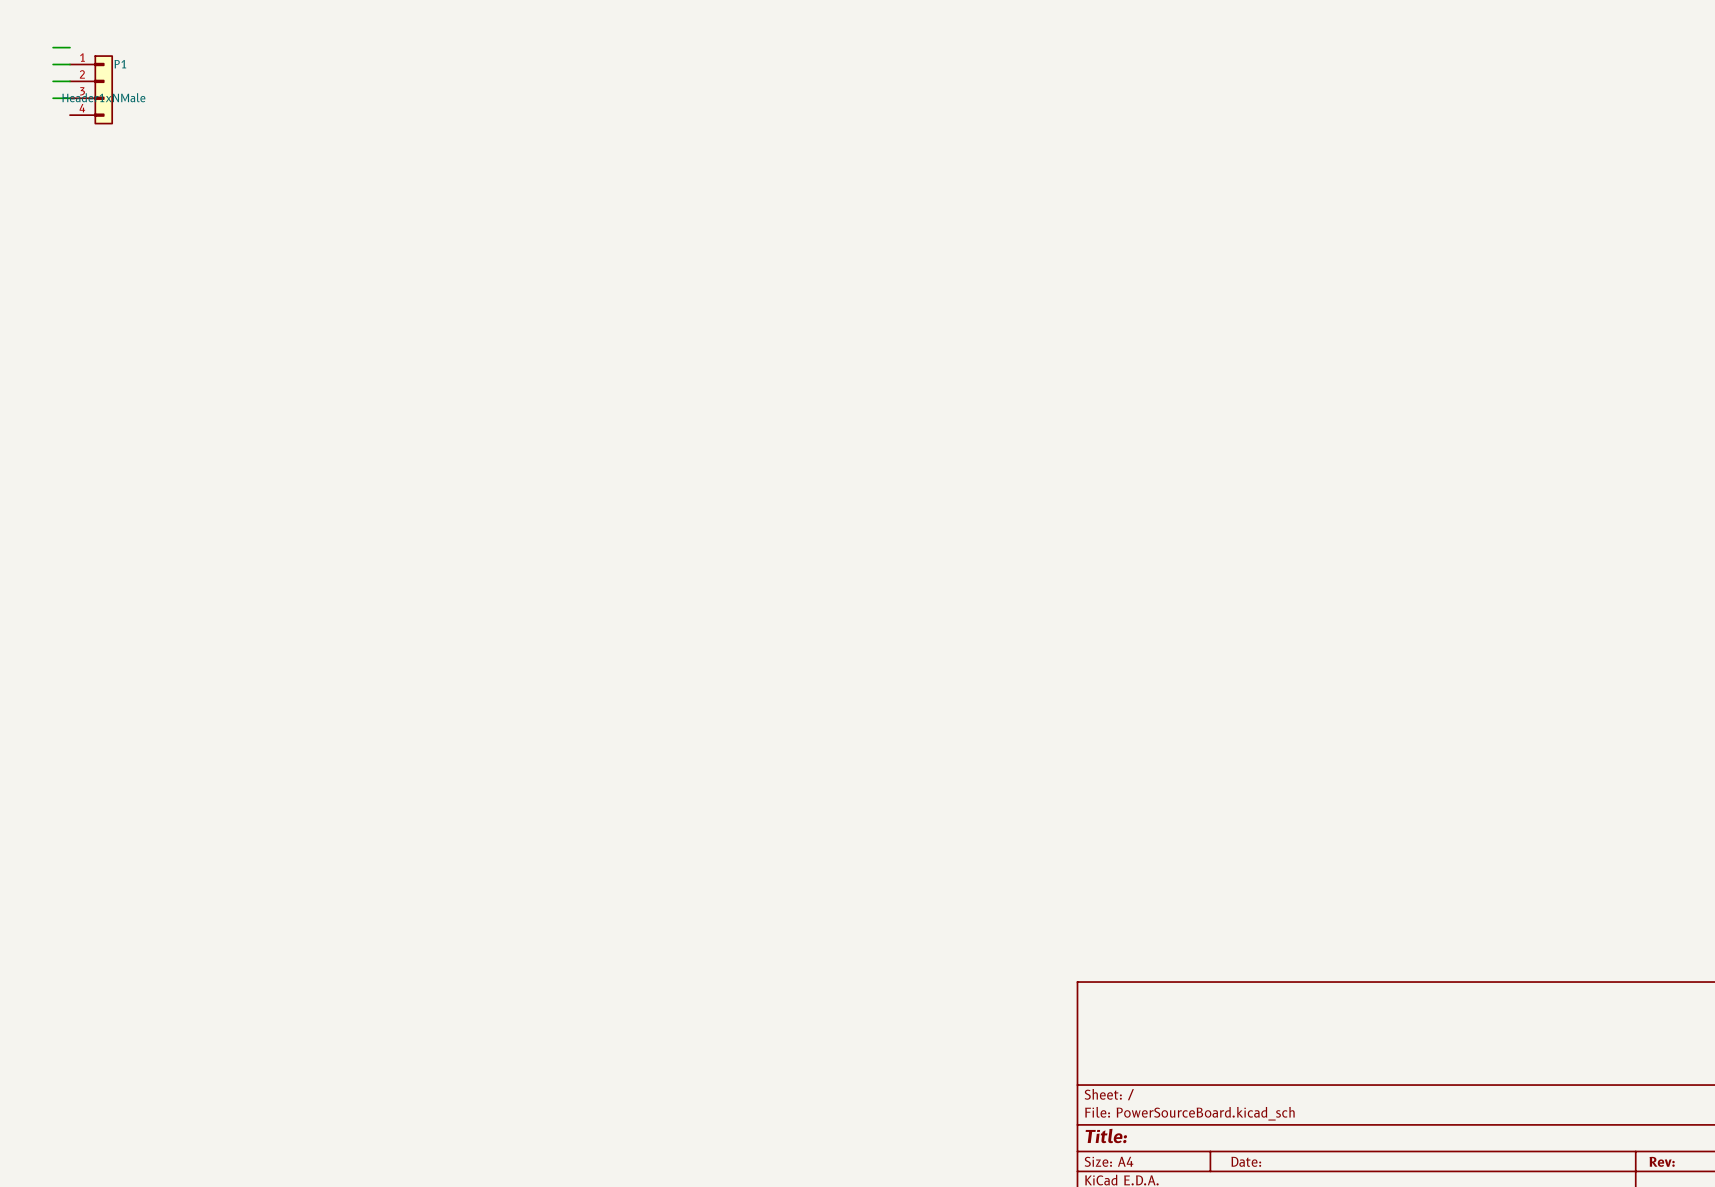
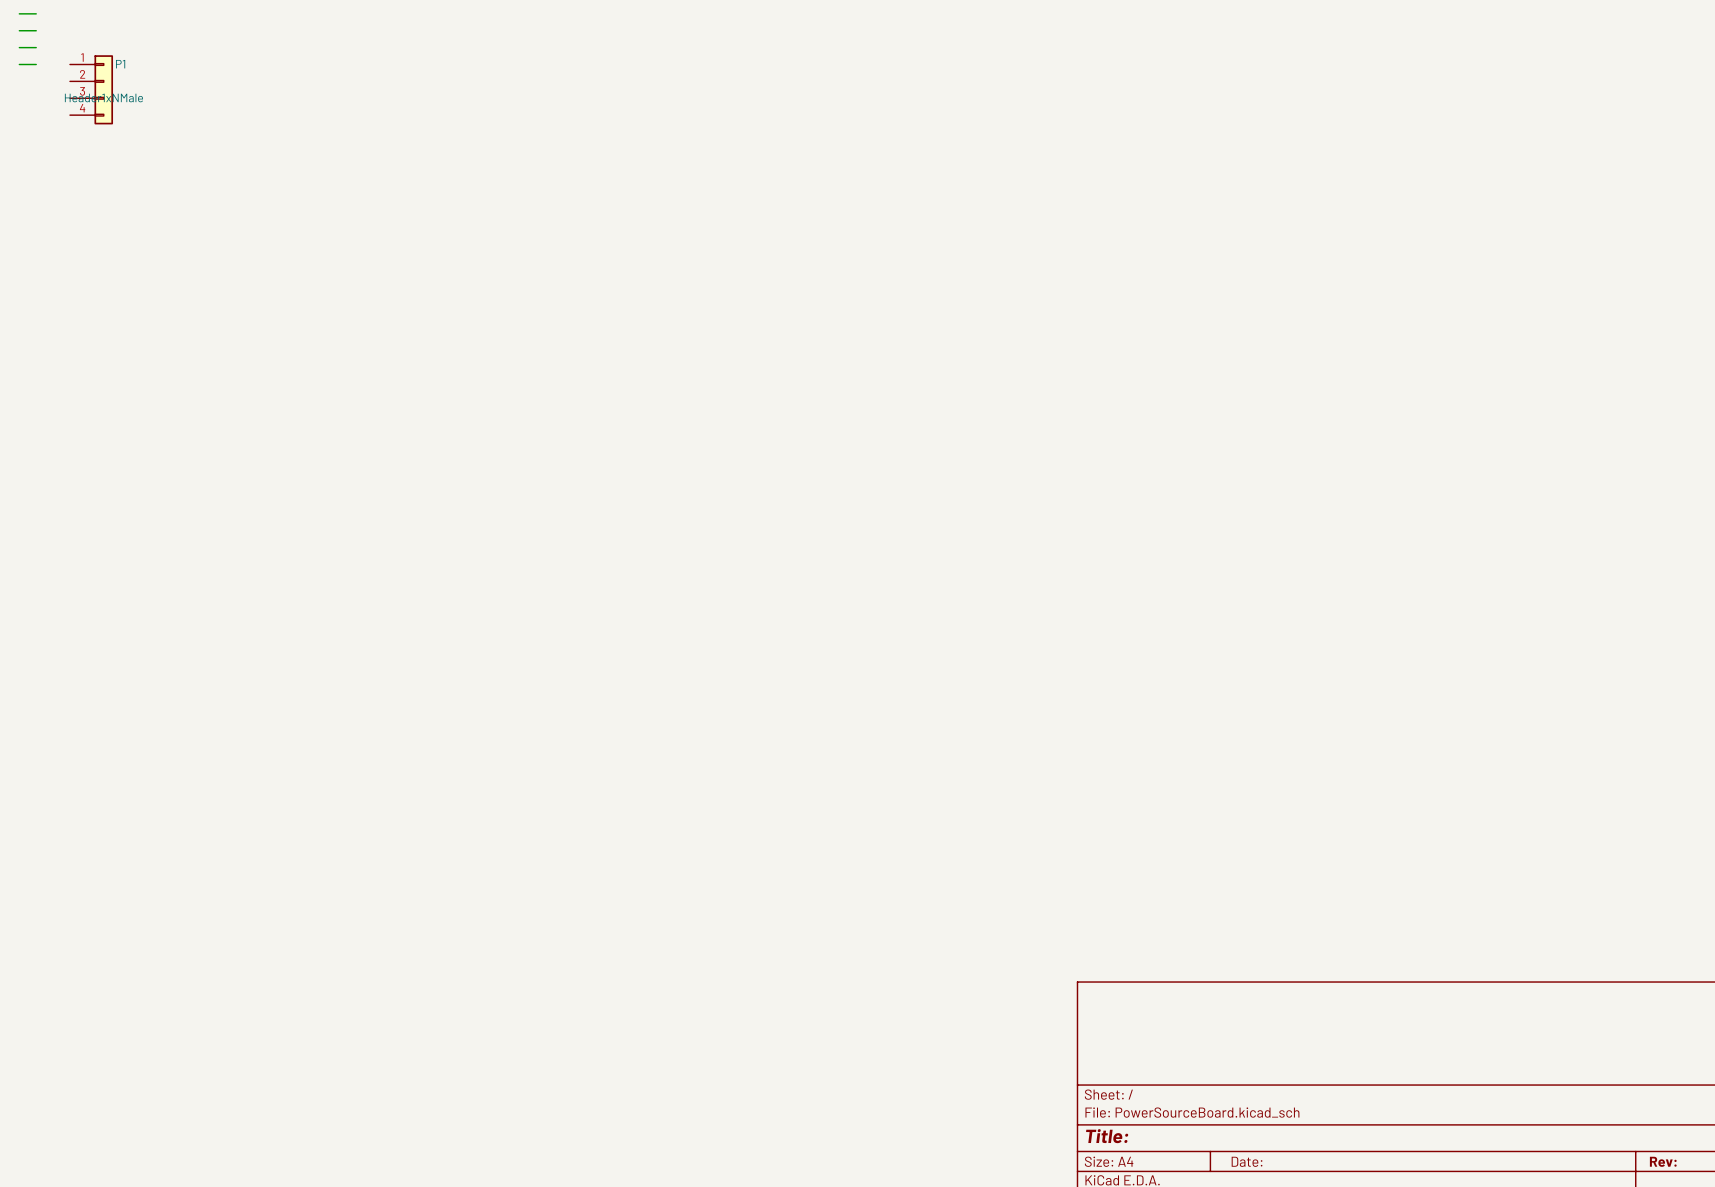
wire: (53, 47) (69, 47) -> (19, 13) (36, 13)
wire: (53, 64) (69, 64) -> (19, 30) (36, 30)
wire: (53, 81) (69, 81) -> (19, 47) (36, 47)
wire: (53, 98) (69, 98) -> (19, 64) (36, 64)

